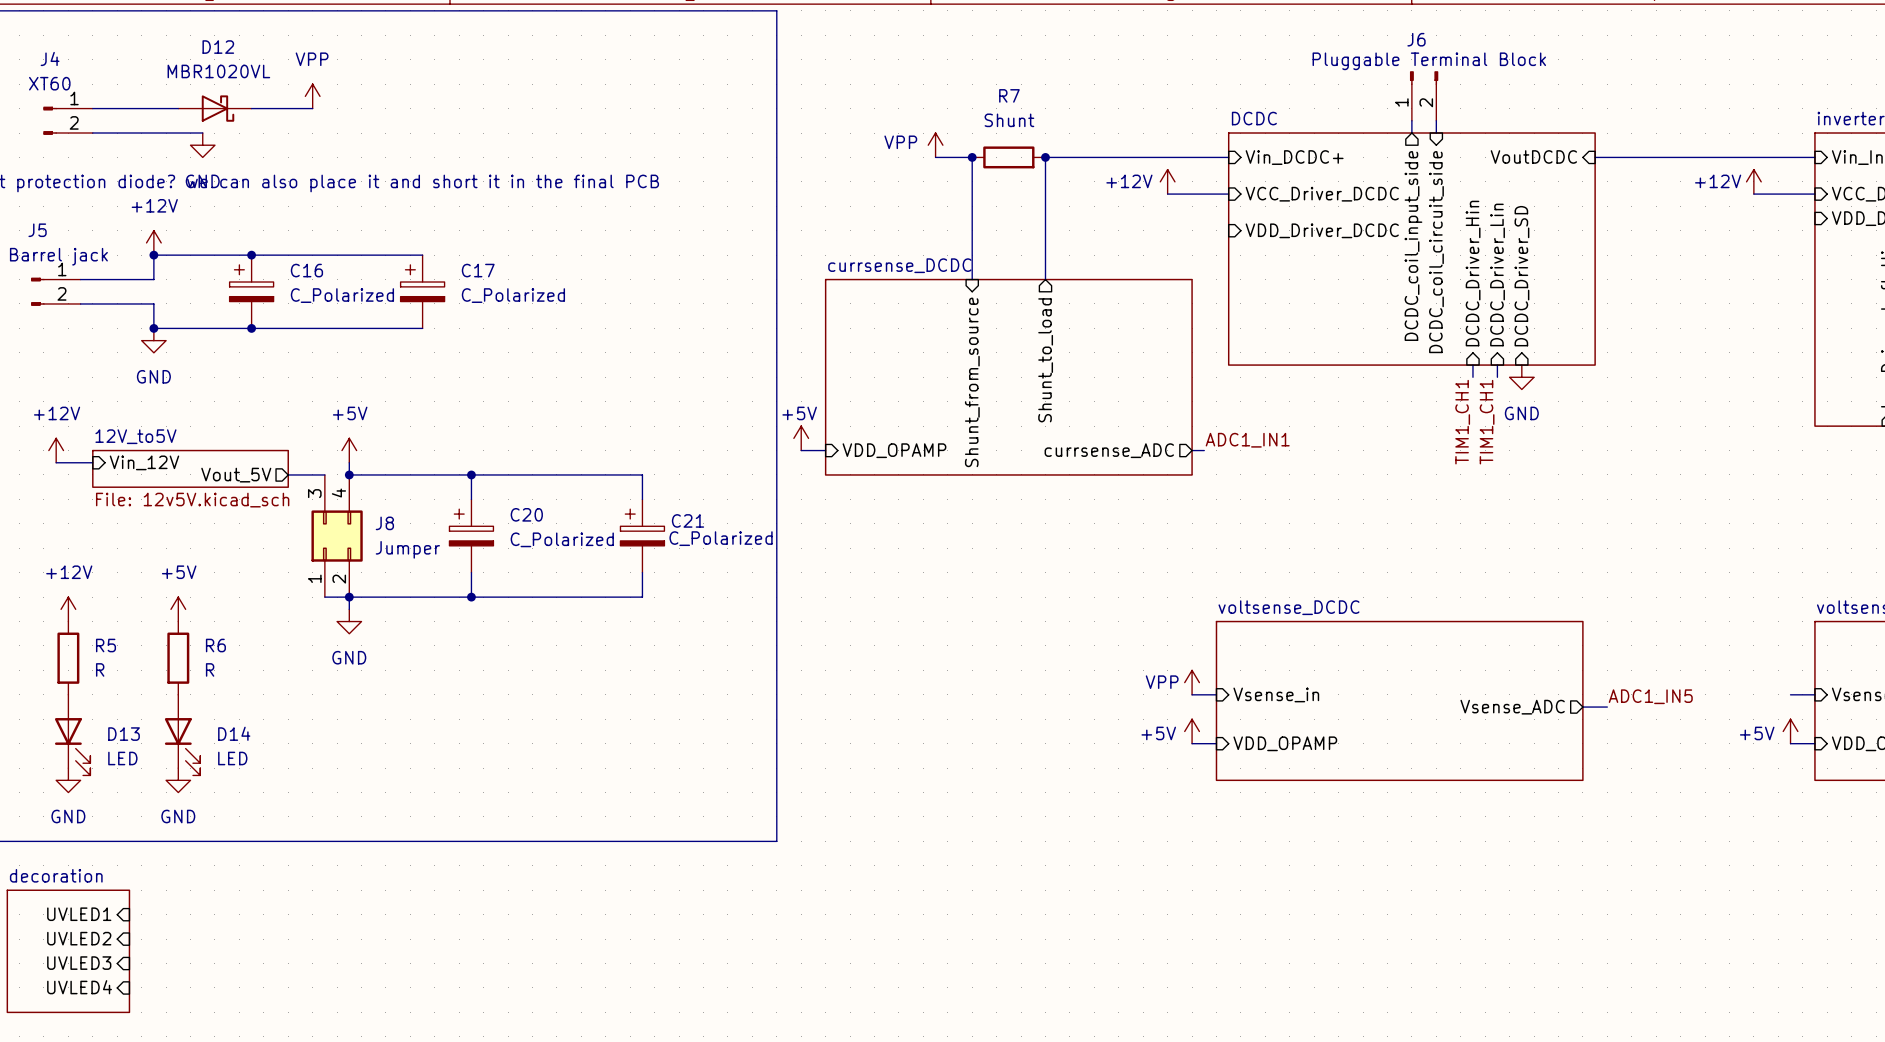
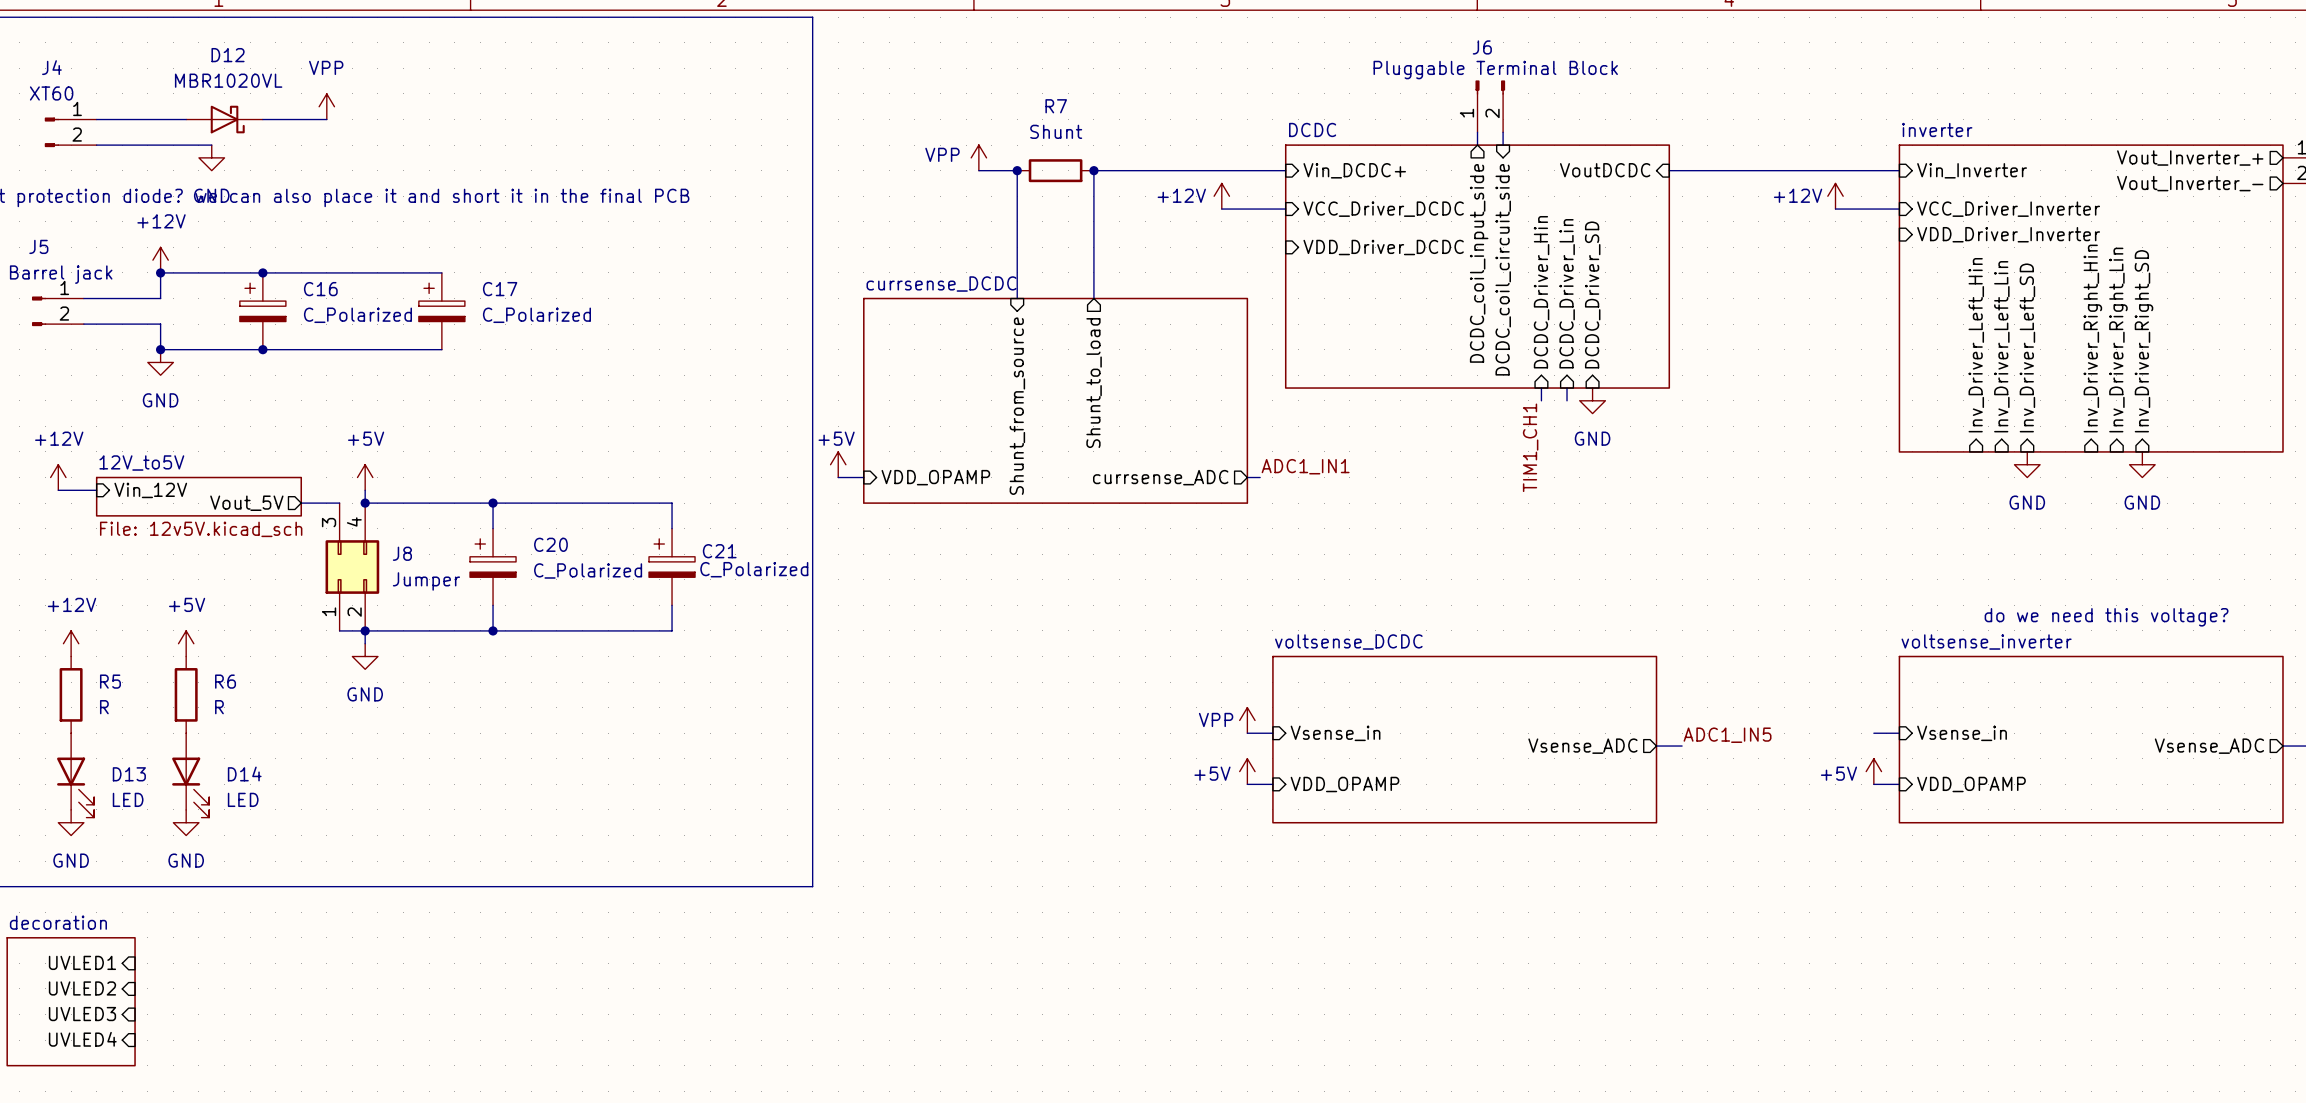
label: TIM1_CH1 (1487, 422) -> none

